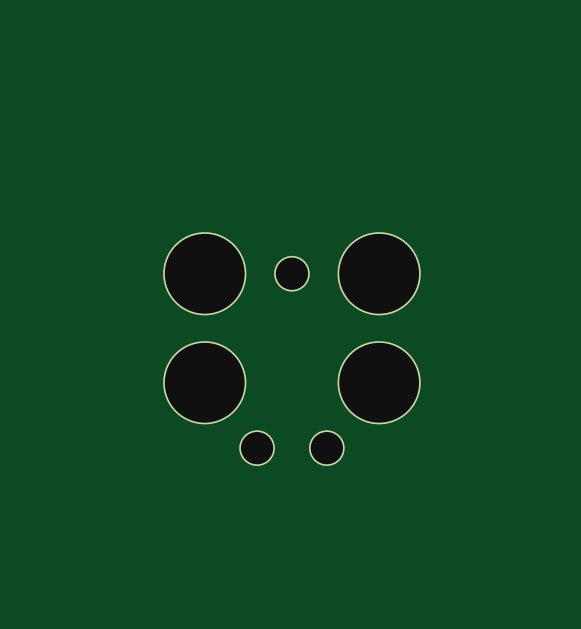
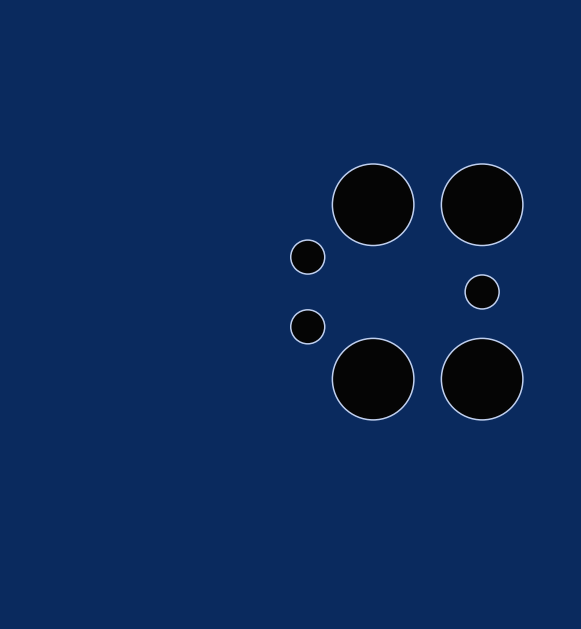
part rotation: 0° (291, 349) -> 90° clockwise (406, 291)

